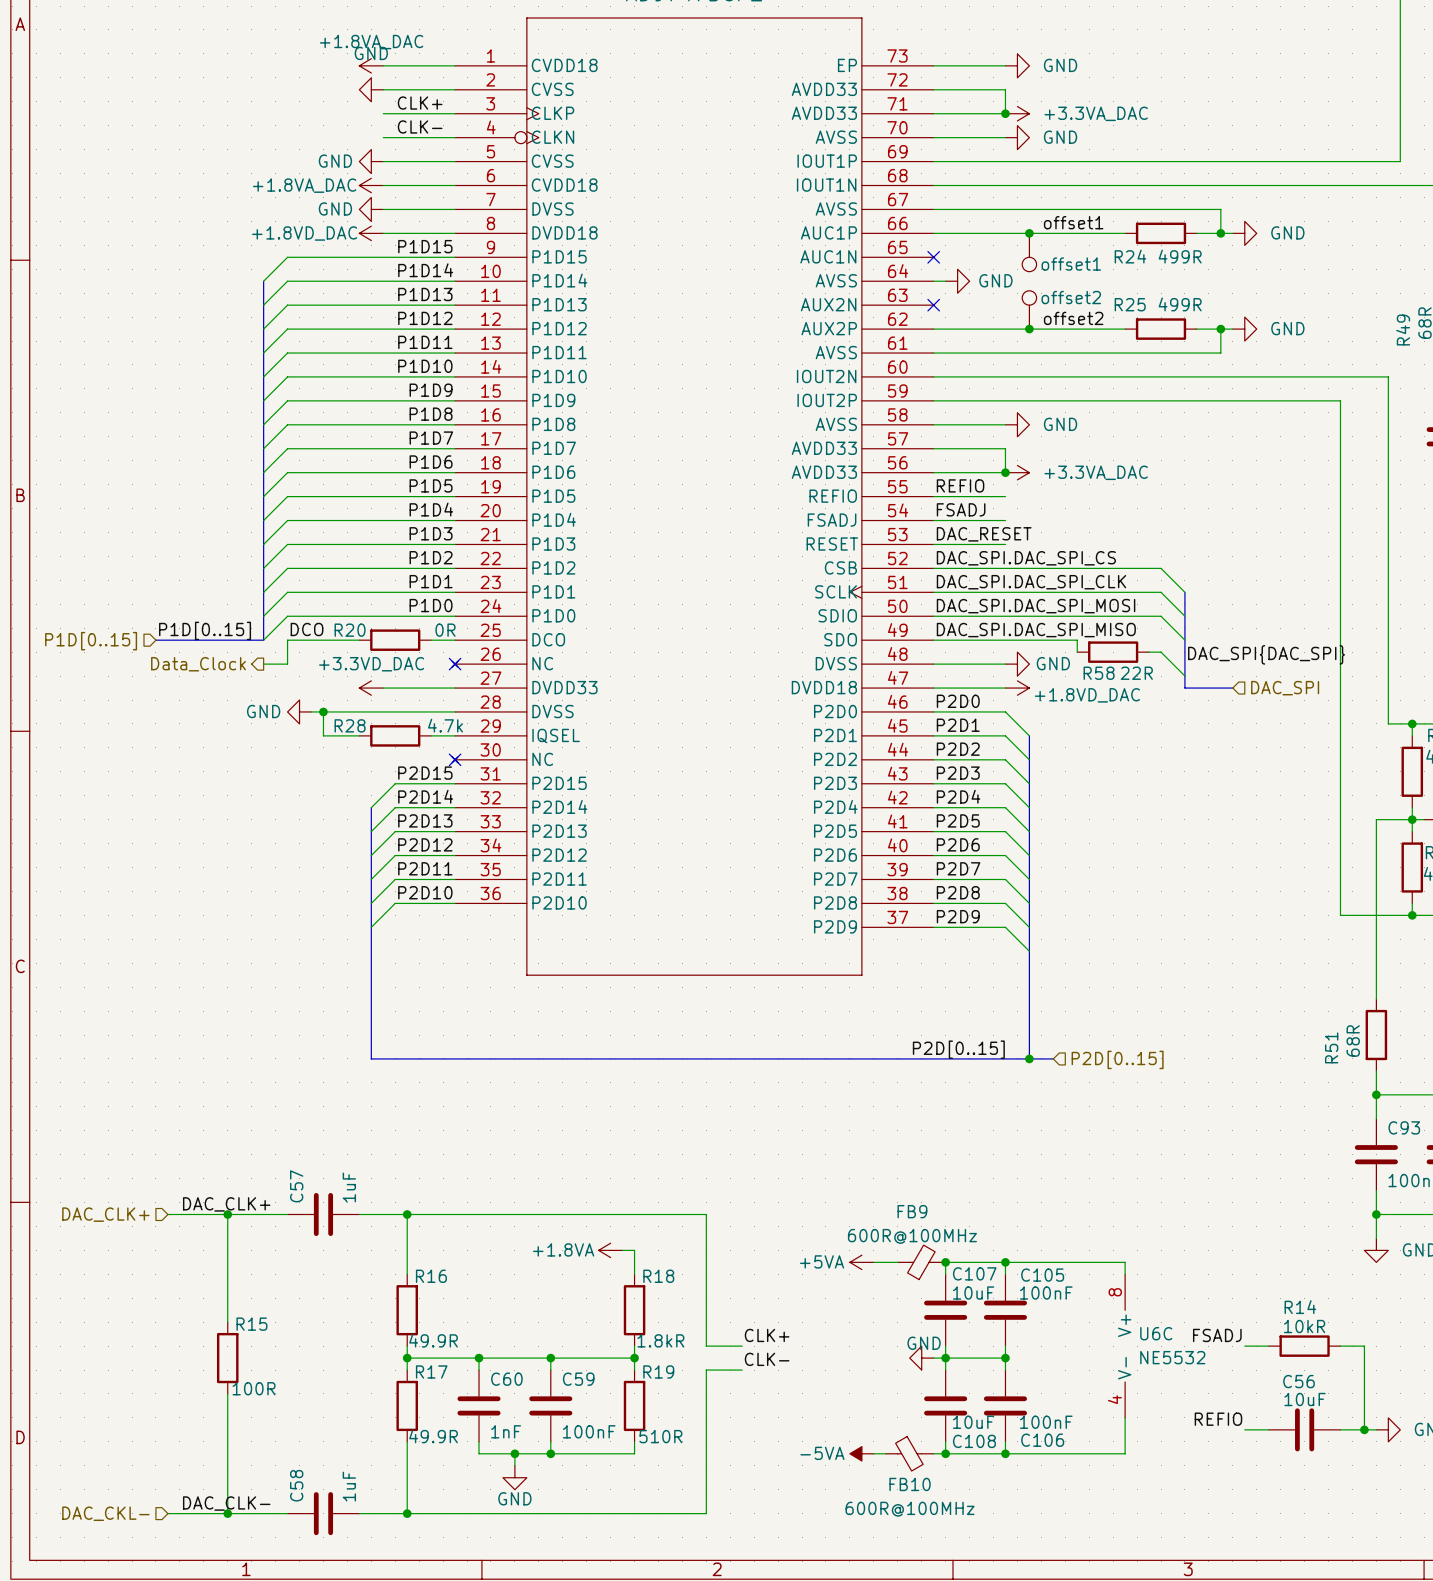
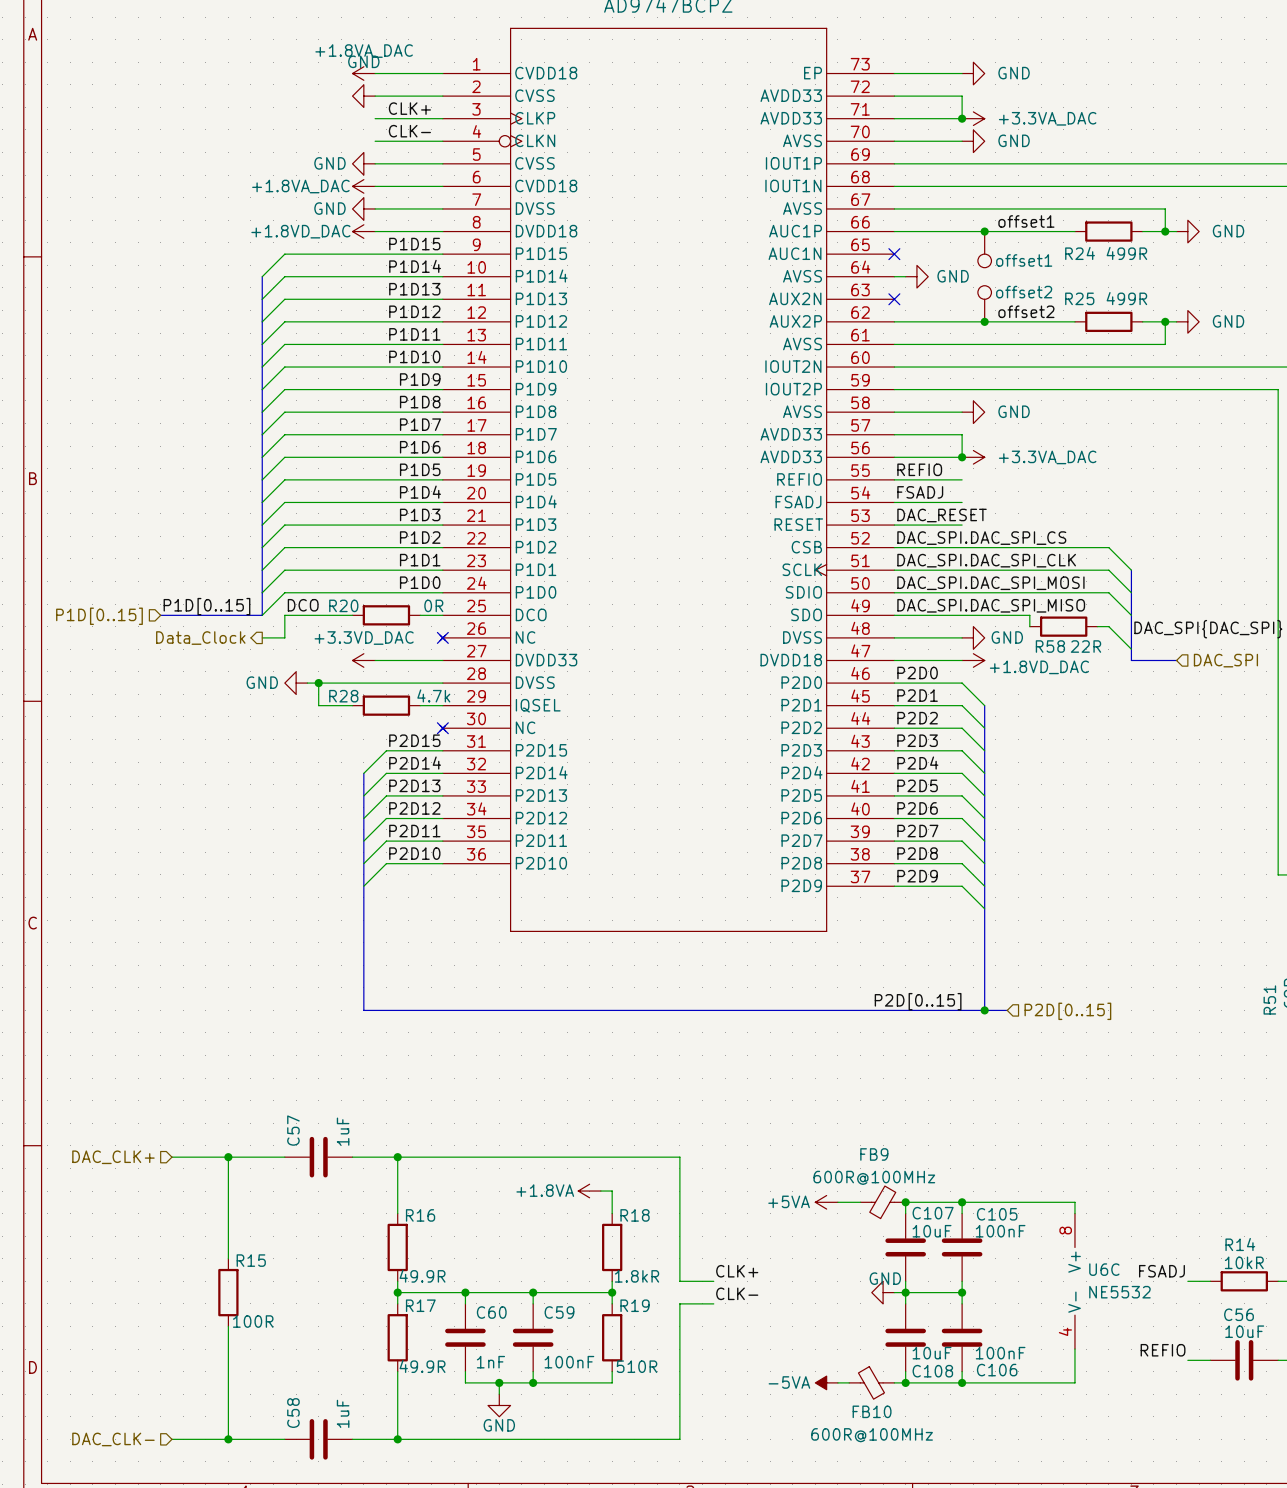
label: DAC_CLK+ (226, 1204) -> none
label: DAC_CLK- (226, 1503) -> none
hierarchical label: DAC_CKL- (105, 1513) -> DAC_CLK- (113, 1439)

